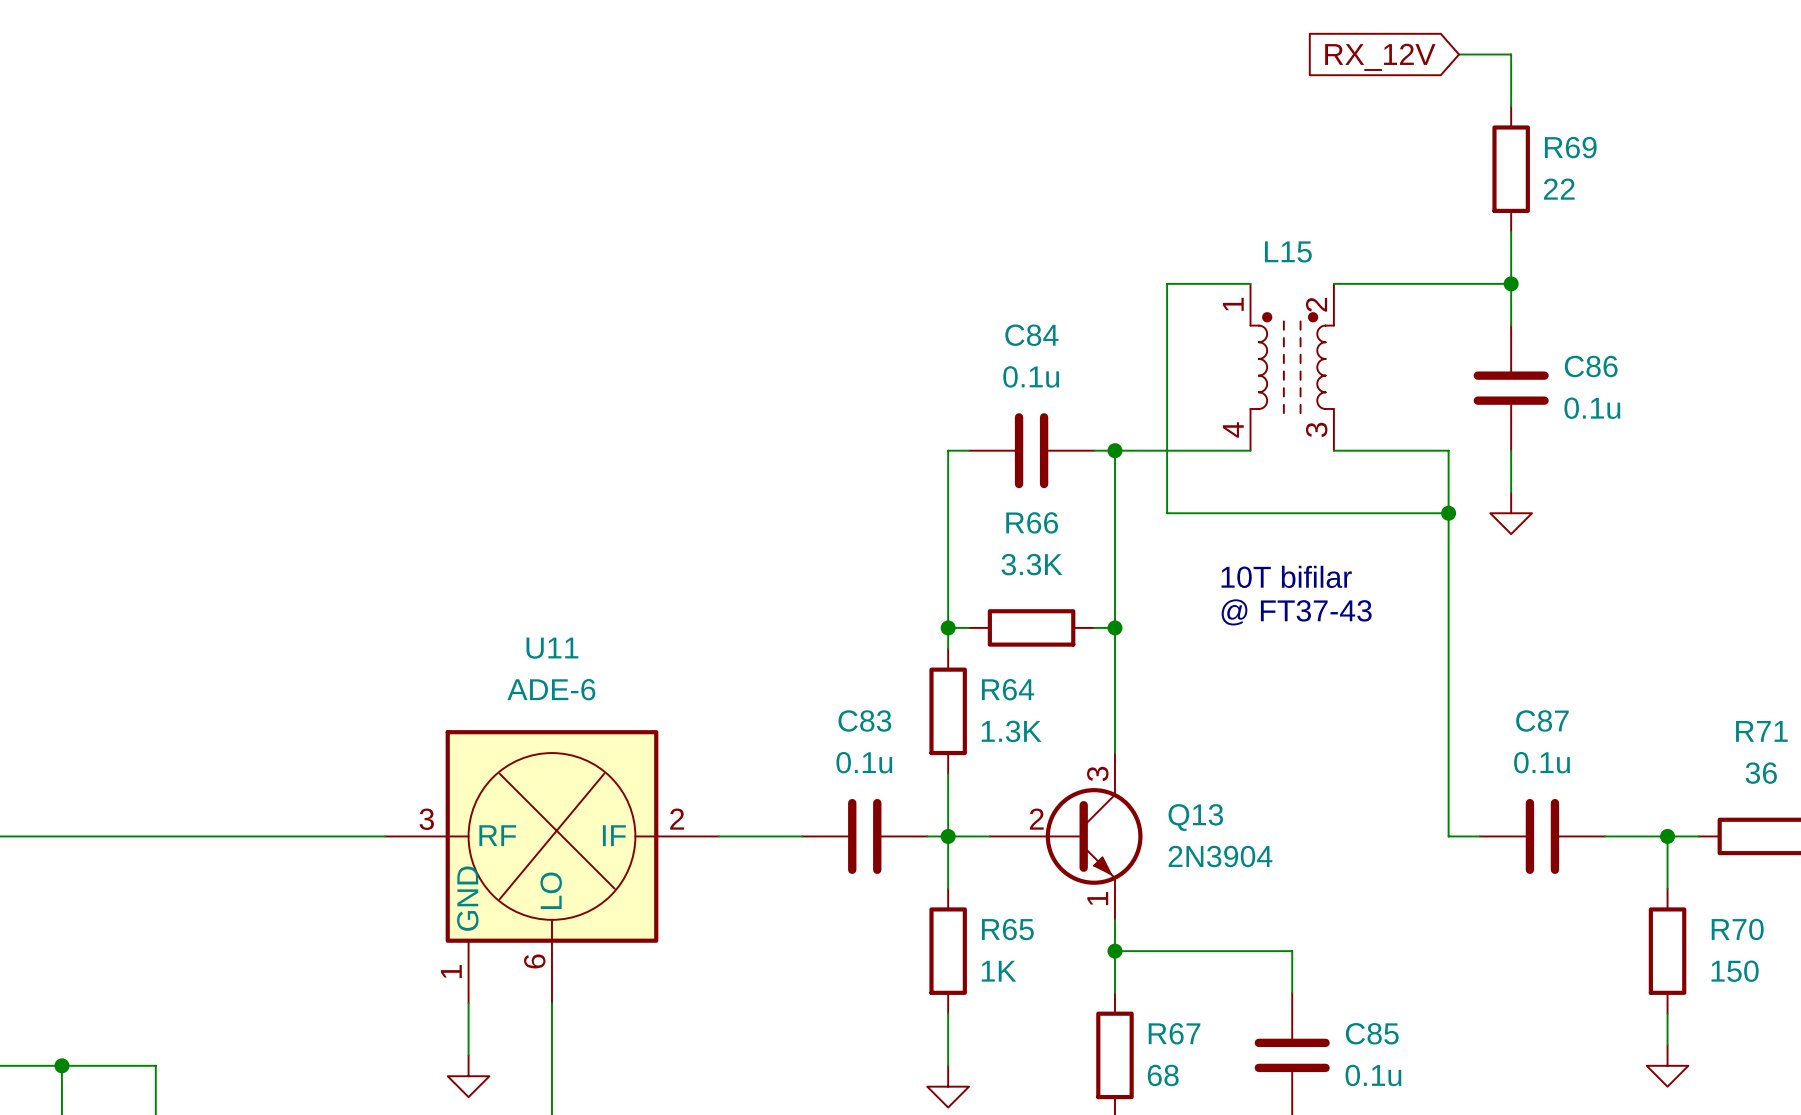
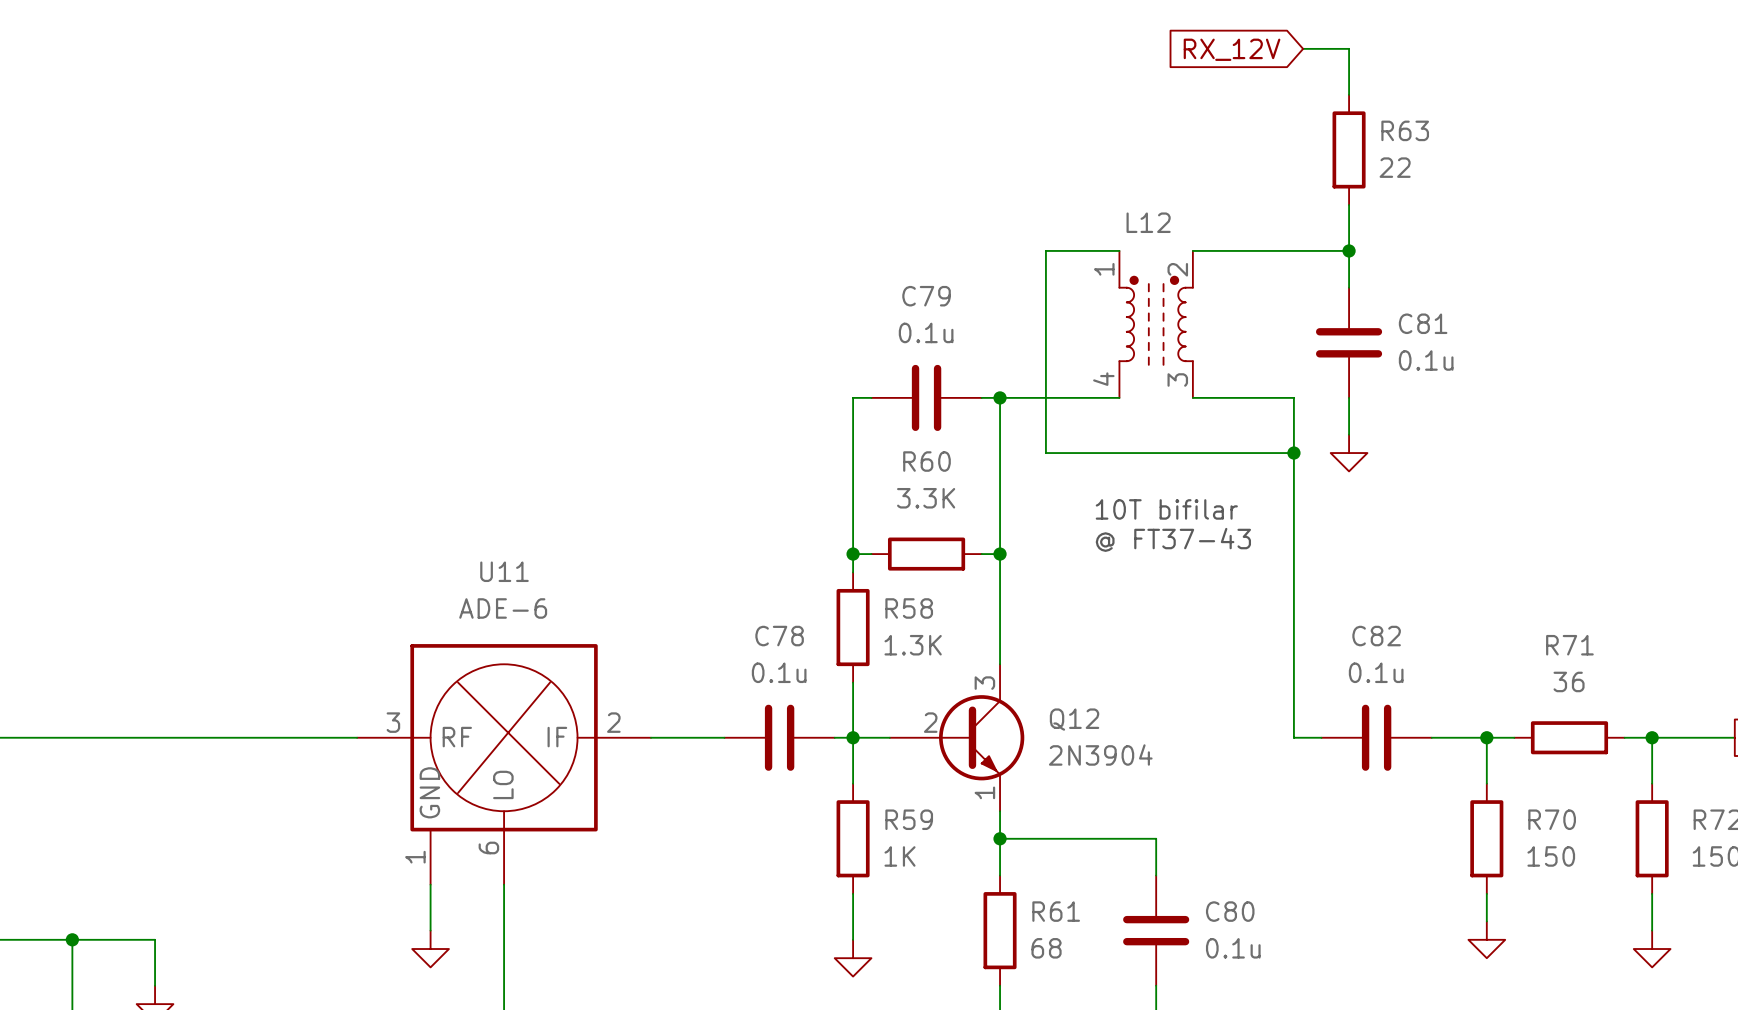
R69 name: R69 (1570, 147) -> R63 (1405, 130)
L15 name: L15 (1288, 251) -> L12 (1148, 222)
C84 name: C84 (1031, 335) -> C79 (926, 296)
C86 name: C86 (1591, 366) -> C81 (1423, 323)
R66 name: R66 (1032, 522) -> R60 (926, 461)
R64 name: R64 (1008, 689) -> R58 (909, 608)
C83 name: C83 (864, 720) -> C78 (779, 636)
C87 name: C87 (1542, 720) -> C82 (1376, 636)
Q13 name: Q13 (1195, 817) -> Q12 (1074, 719)
R65 name: R65 (1007, 929) -> R59 (909, 819)
R67 name: R67 (1174, 1033) -> R61 (1056, 911)
C85 name: C85 (1372, 1033) -> C80 (1230, 911)

